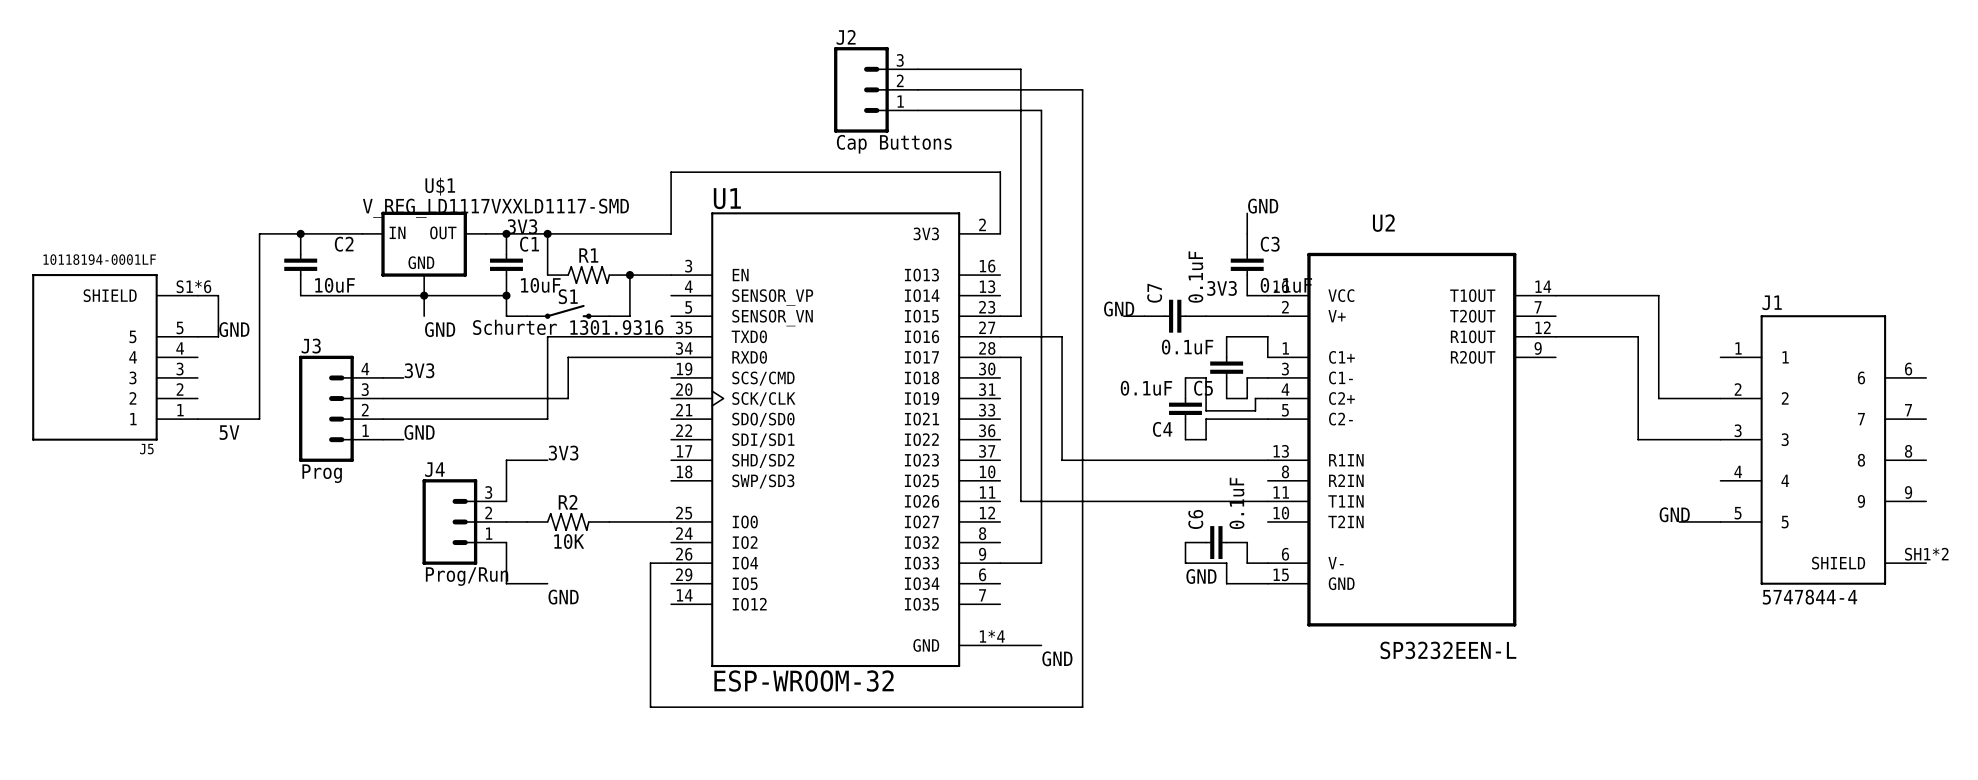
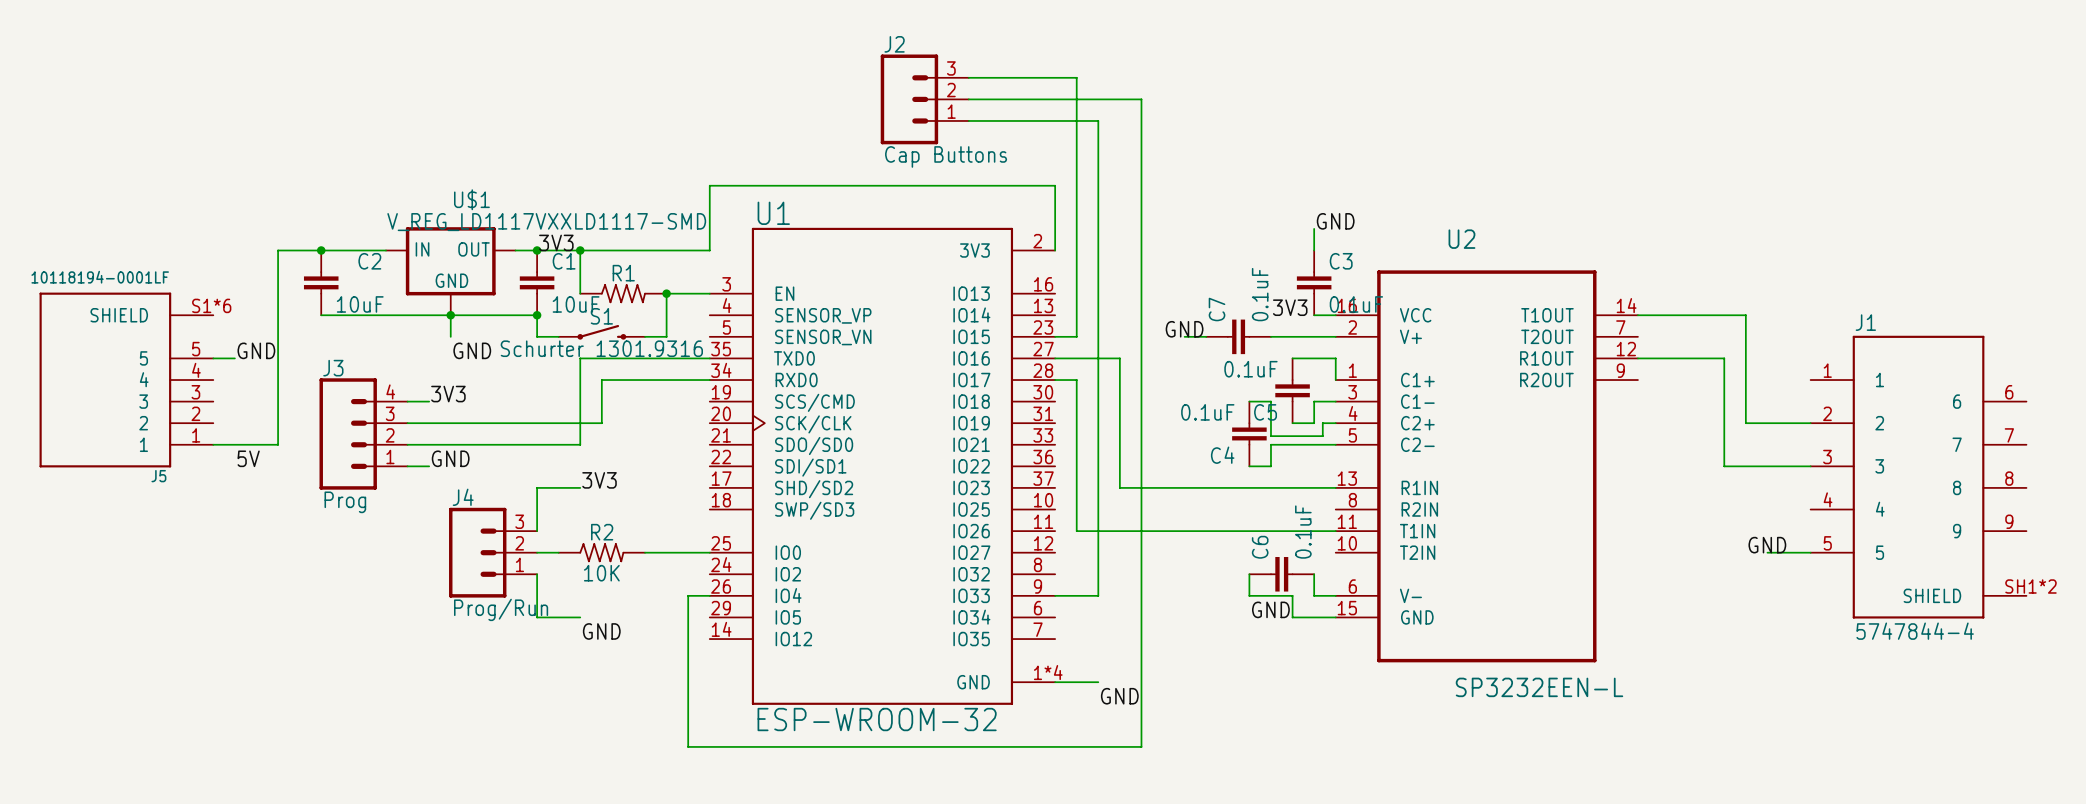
wire: (197, 295) (218, 295) (218, 336) -> none

